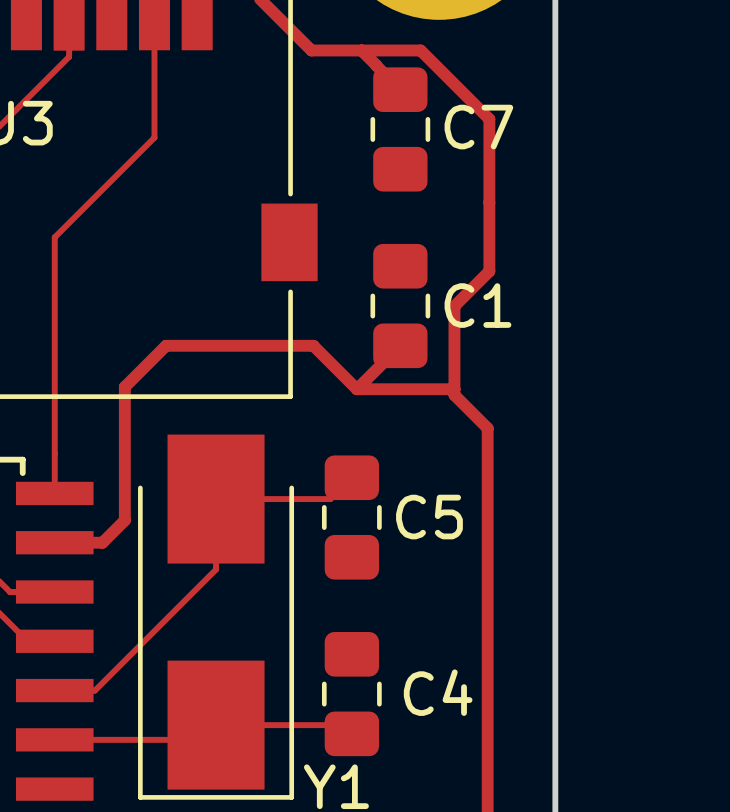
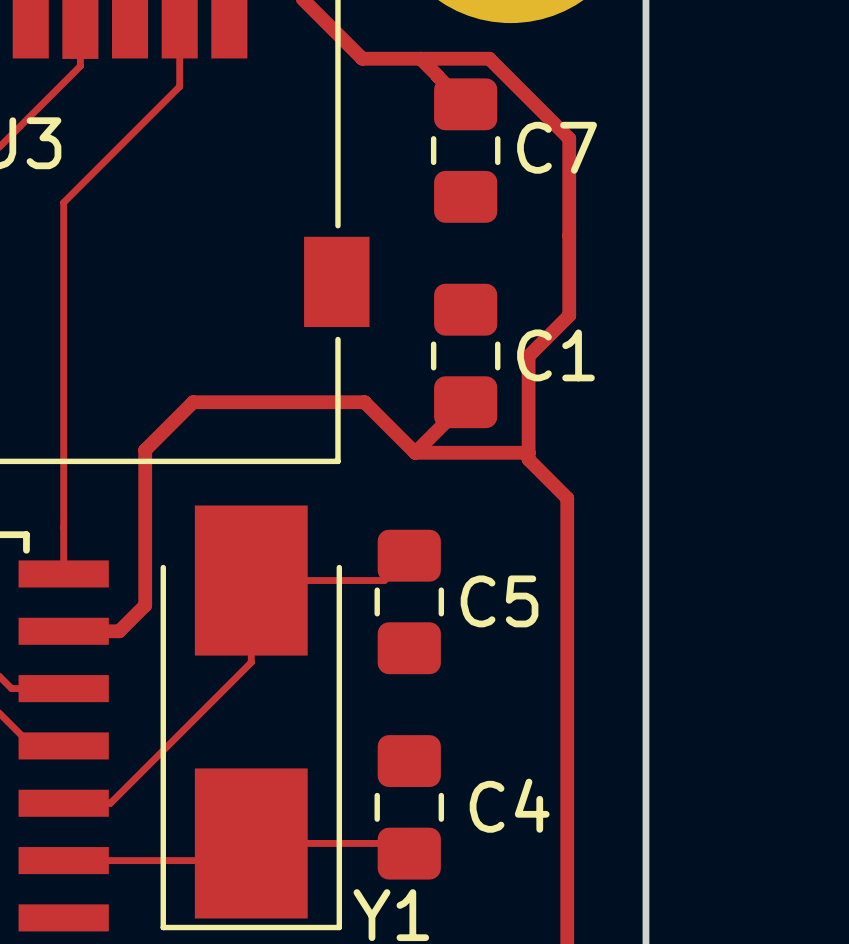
track: (154, 74) (154, 137) (54, 237) -> (179, 86) (63, 202) (63, 276)

